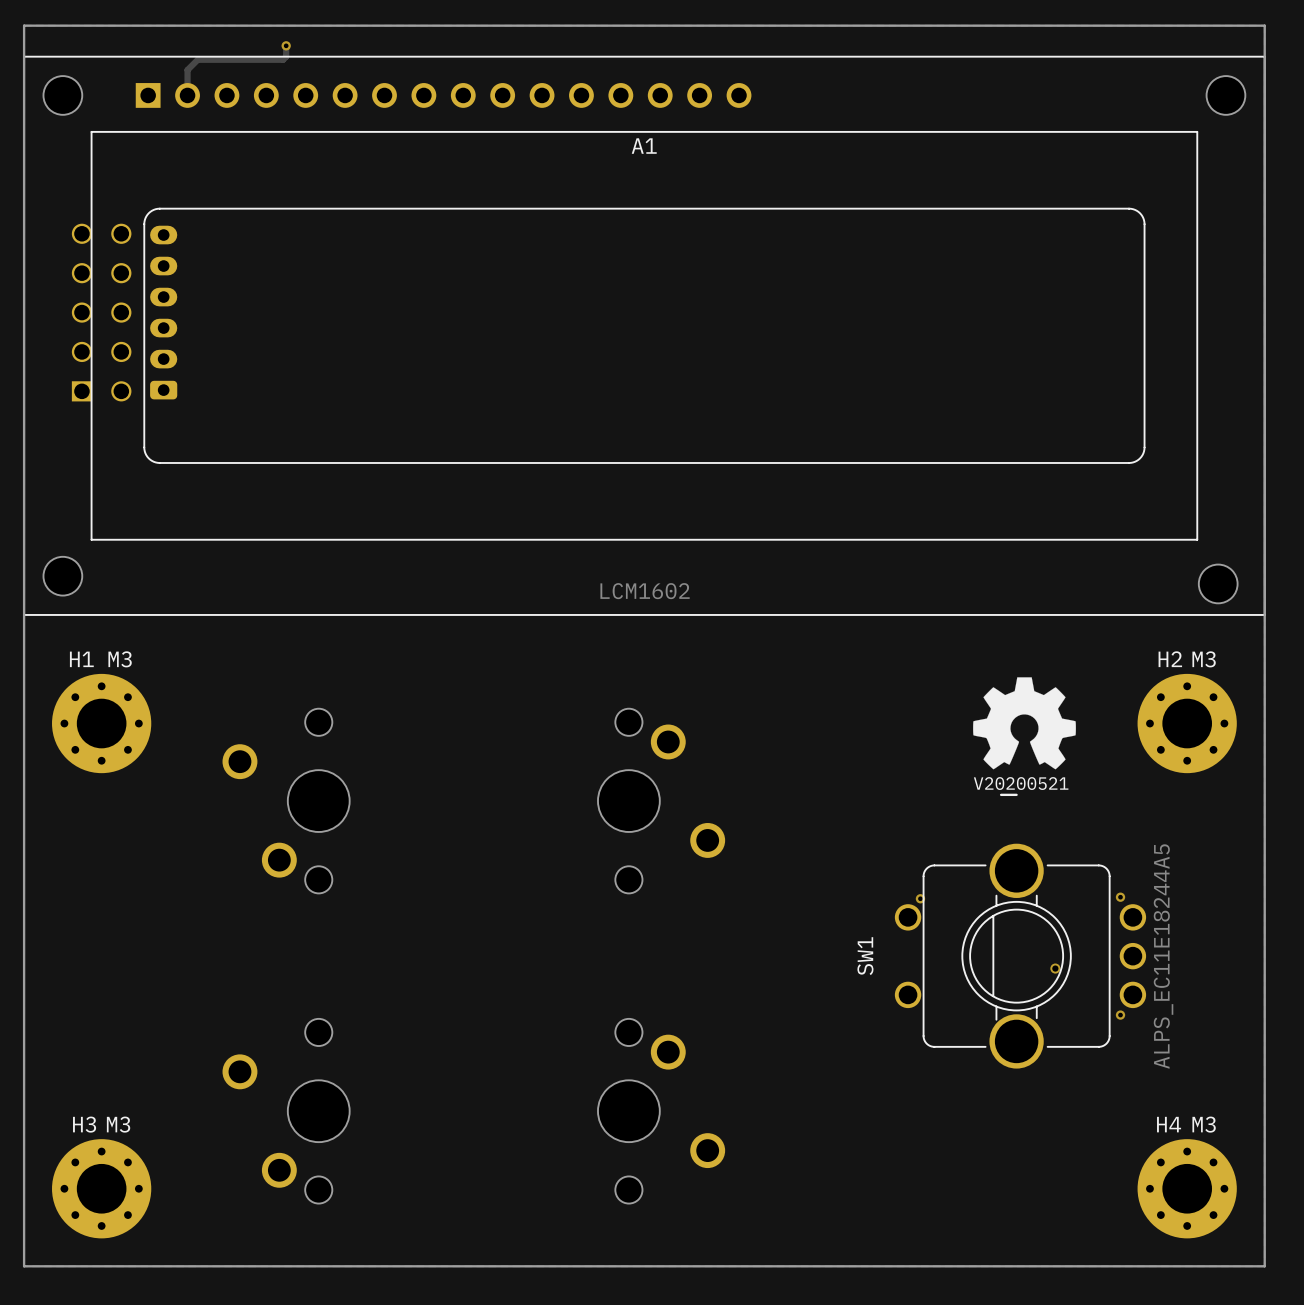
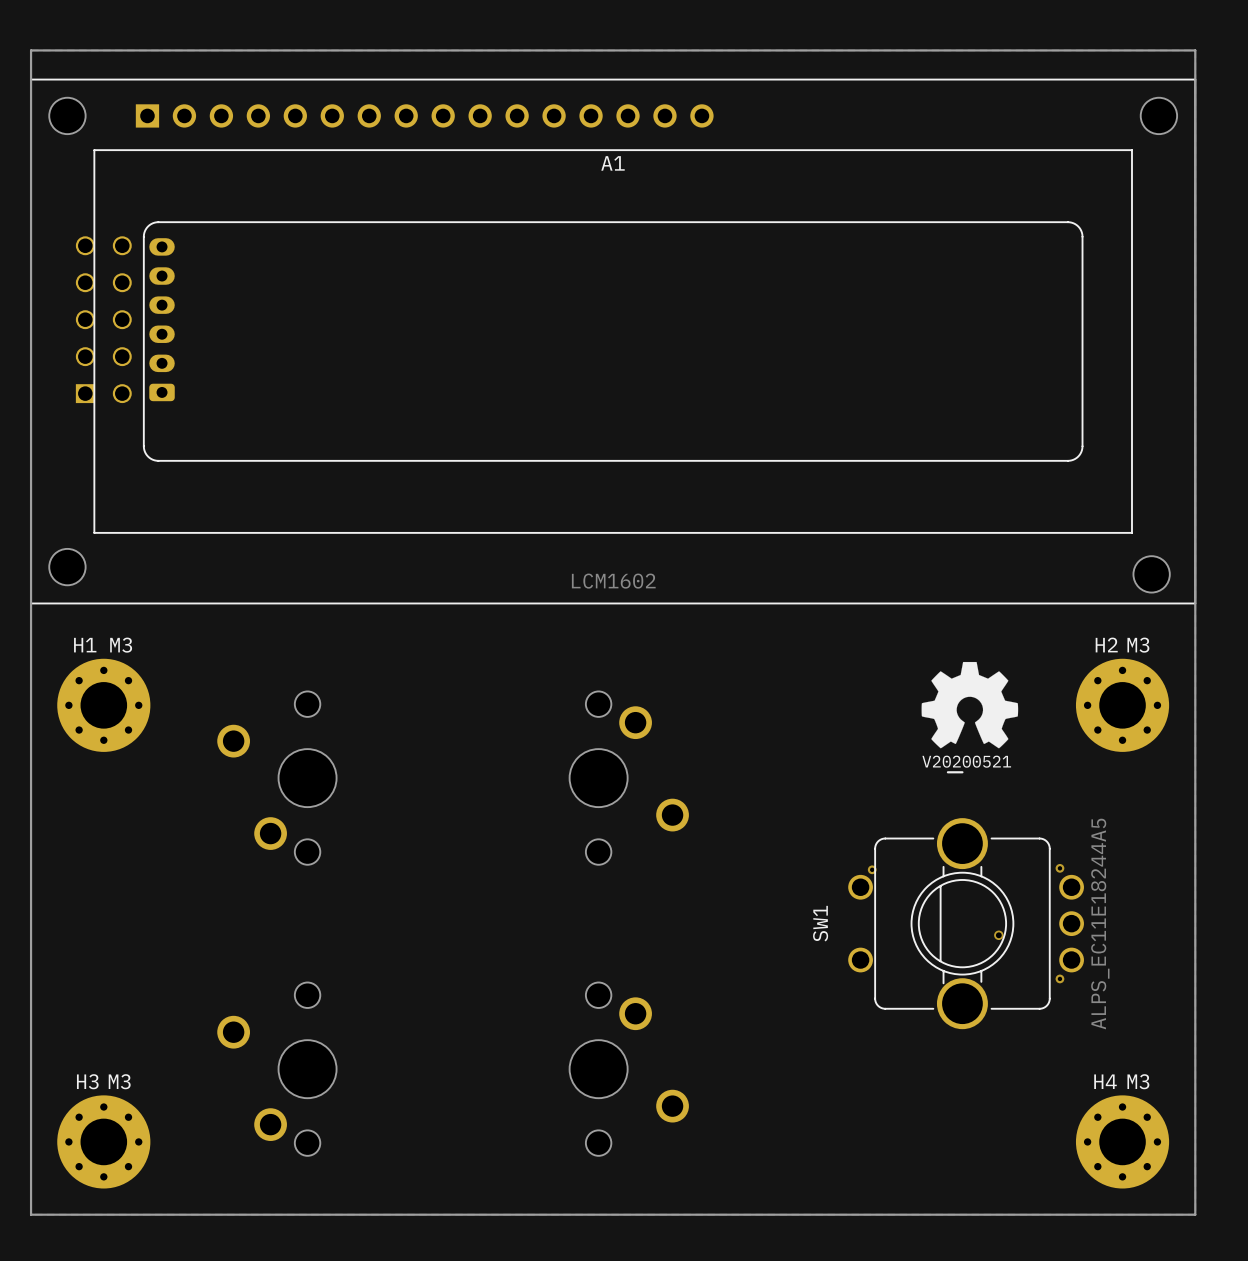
track: (286, 45) (286, 56) (283, 59) (197, 59) (187, 70) (187, 95) -> none
via: (286, 45) -> none

